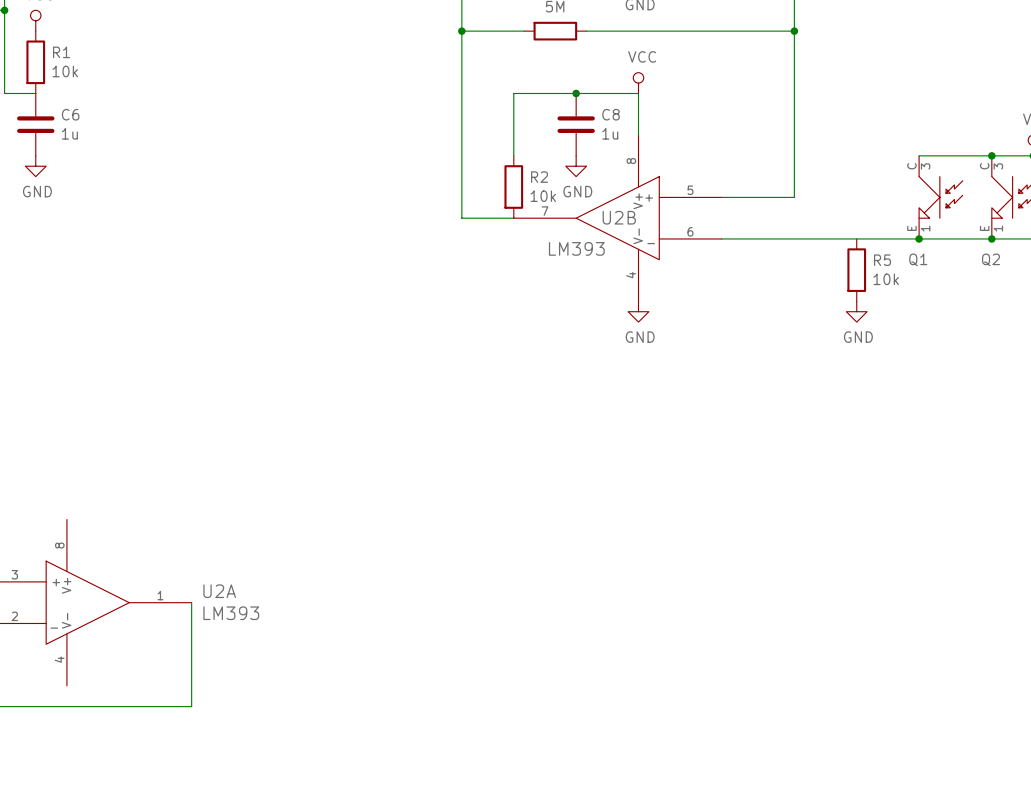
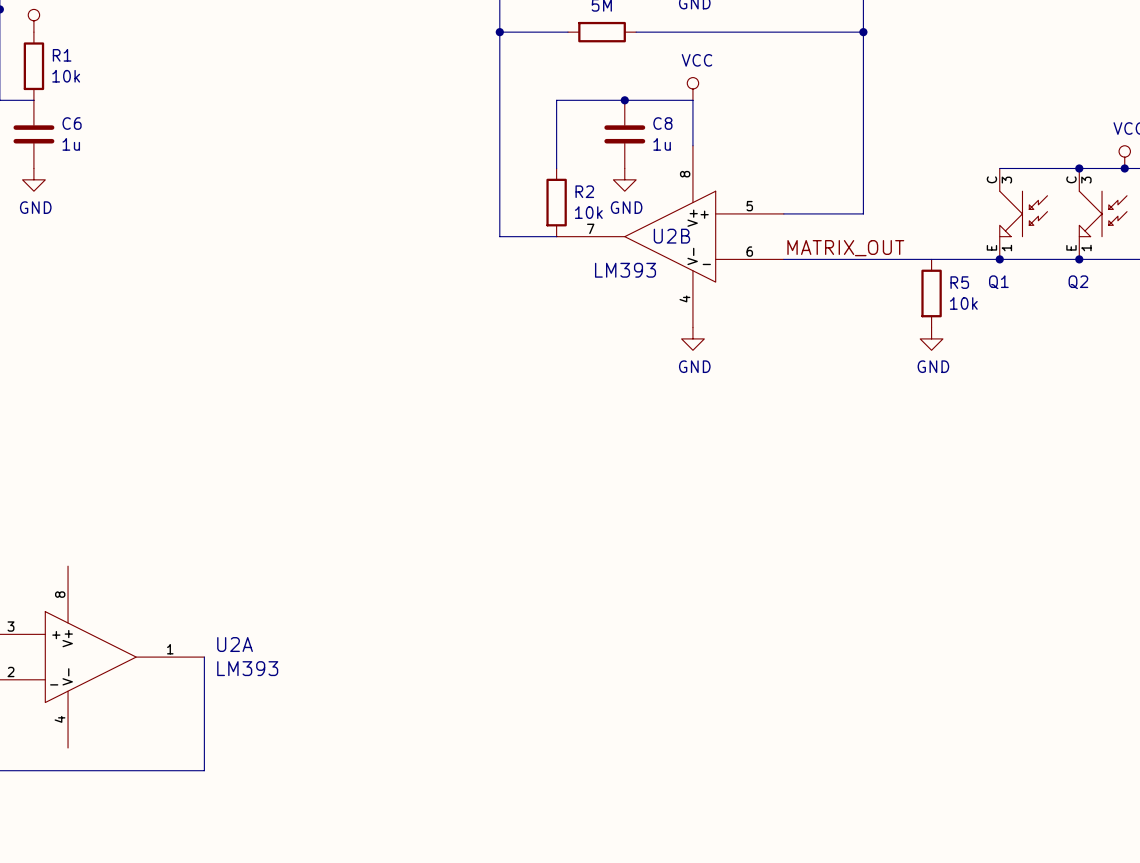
label: none -> MATRIX_OUT (845, 248)

